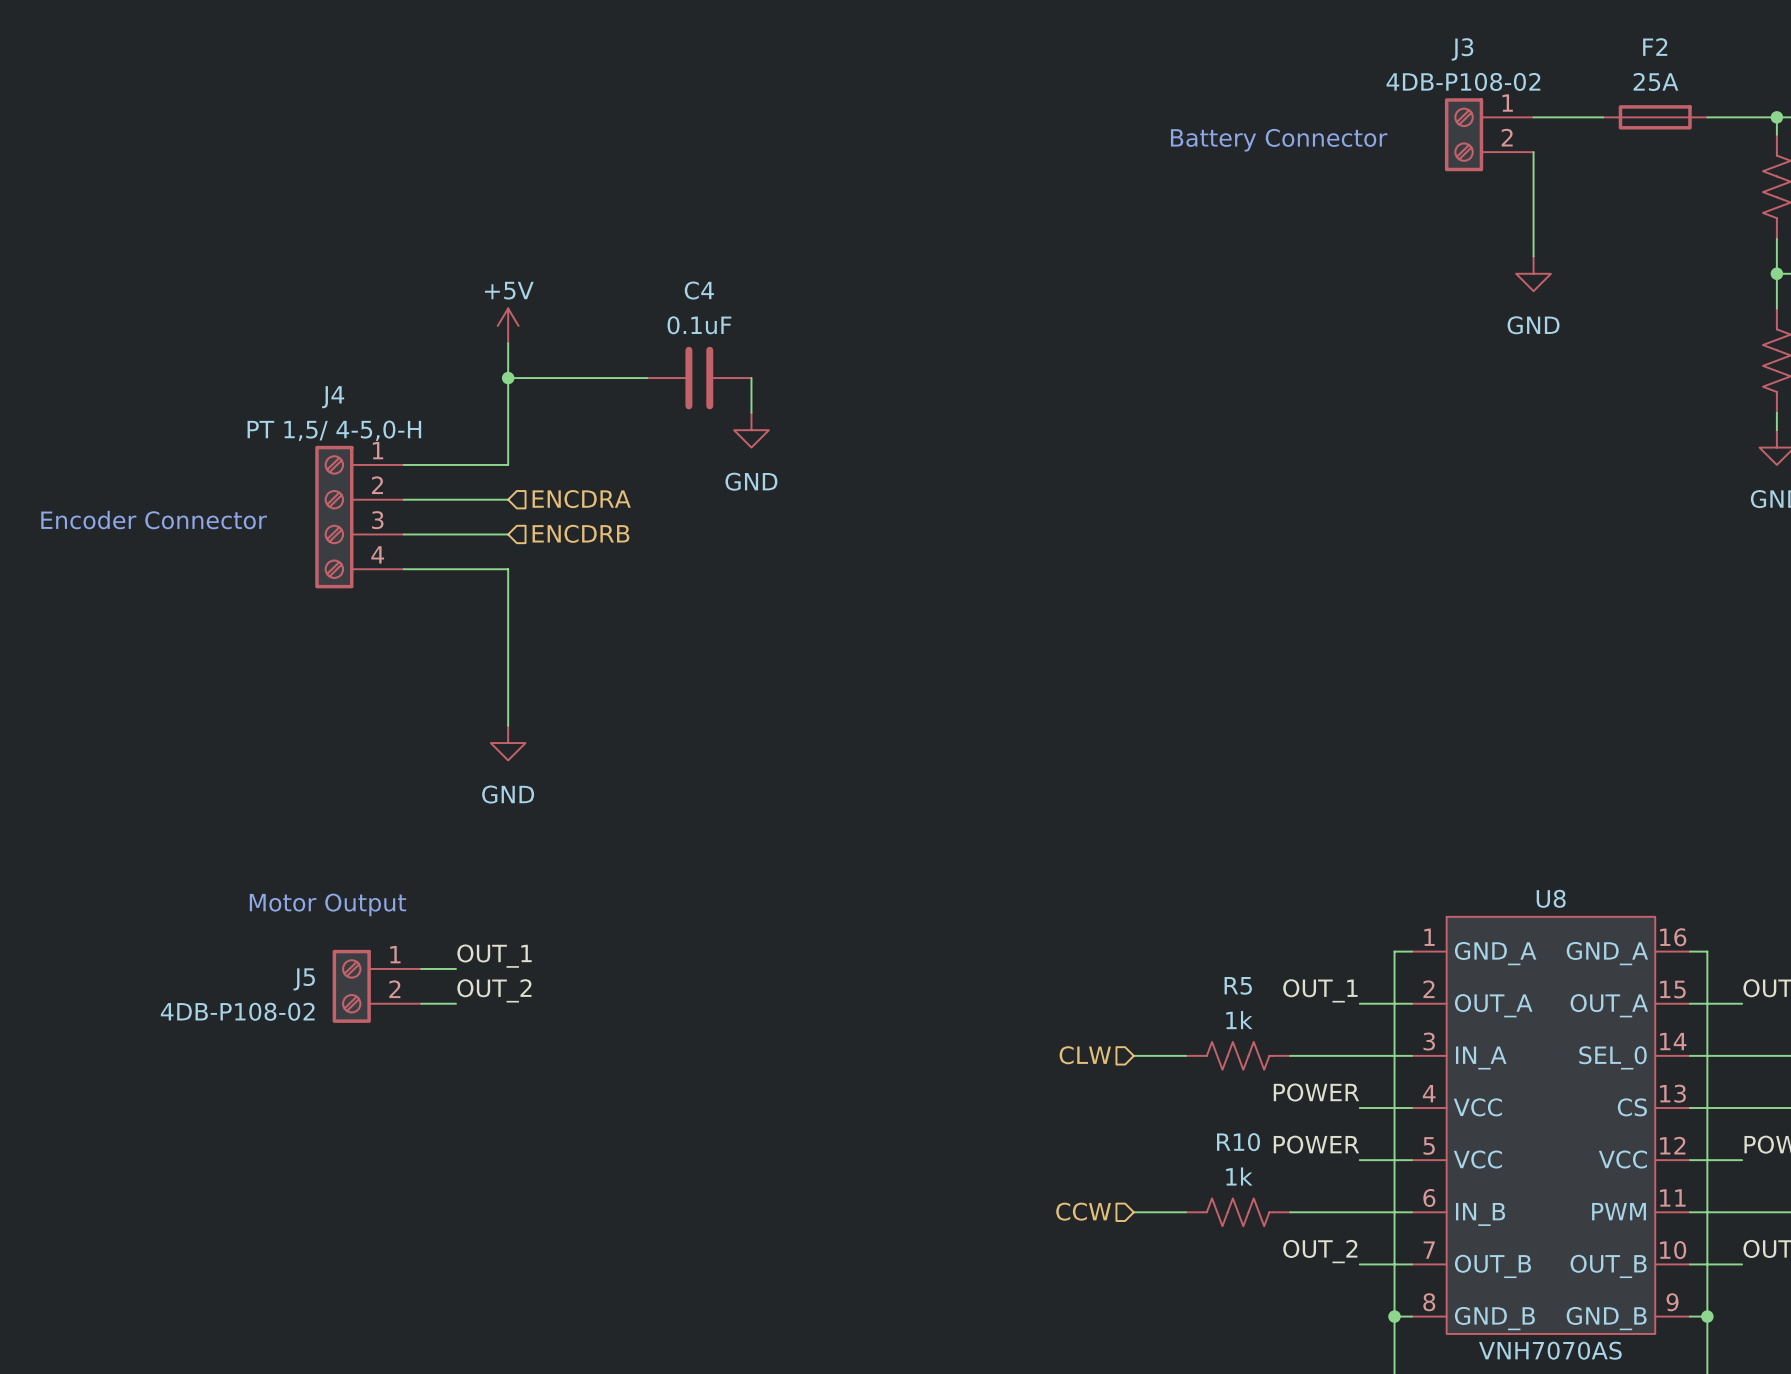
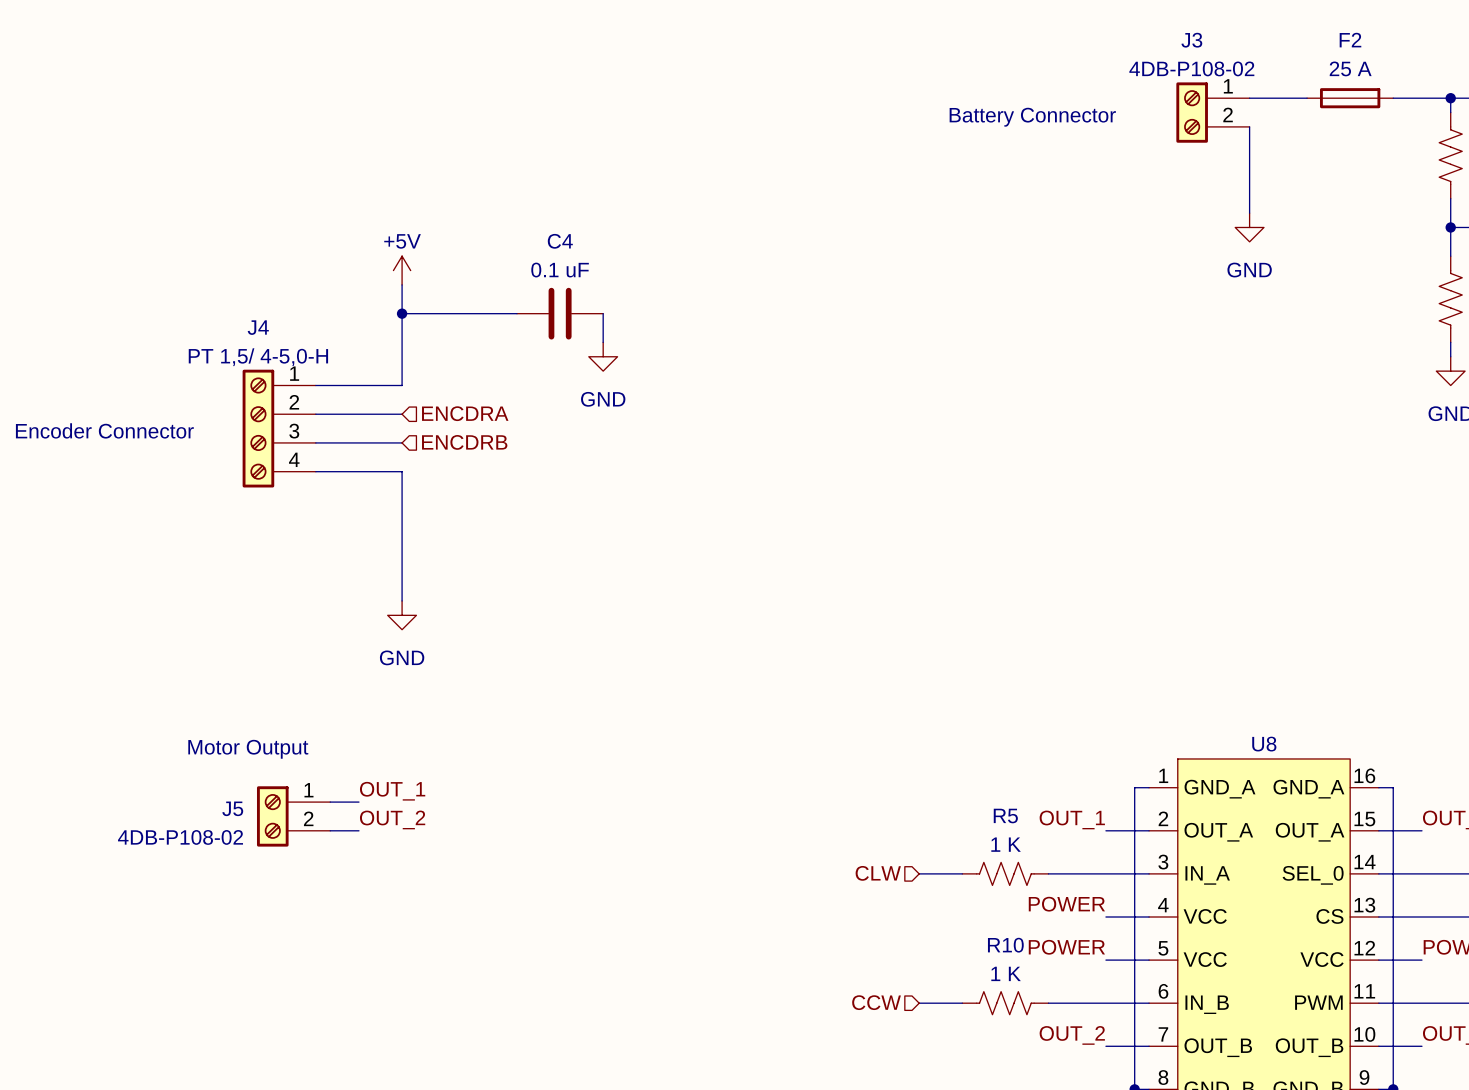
F2 value: 25A (1656, 81) -> 25 A (1350, 68)
C4 value: 0.1uF (699, 325) -> 0.1 uF (560, 270)
R5 value: 1k (1239, 1020) -> 1 K (1006, 844)
R10 value: 1k (1239, 1176) -> 1 K (1006, 973)

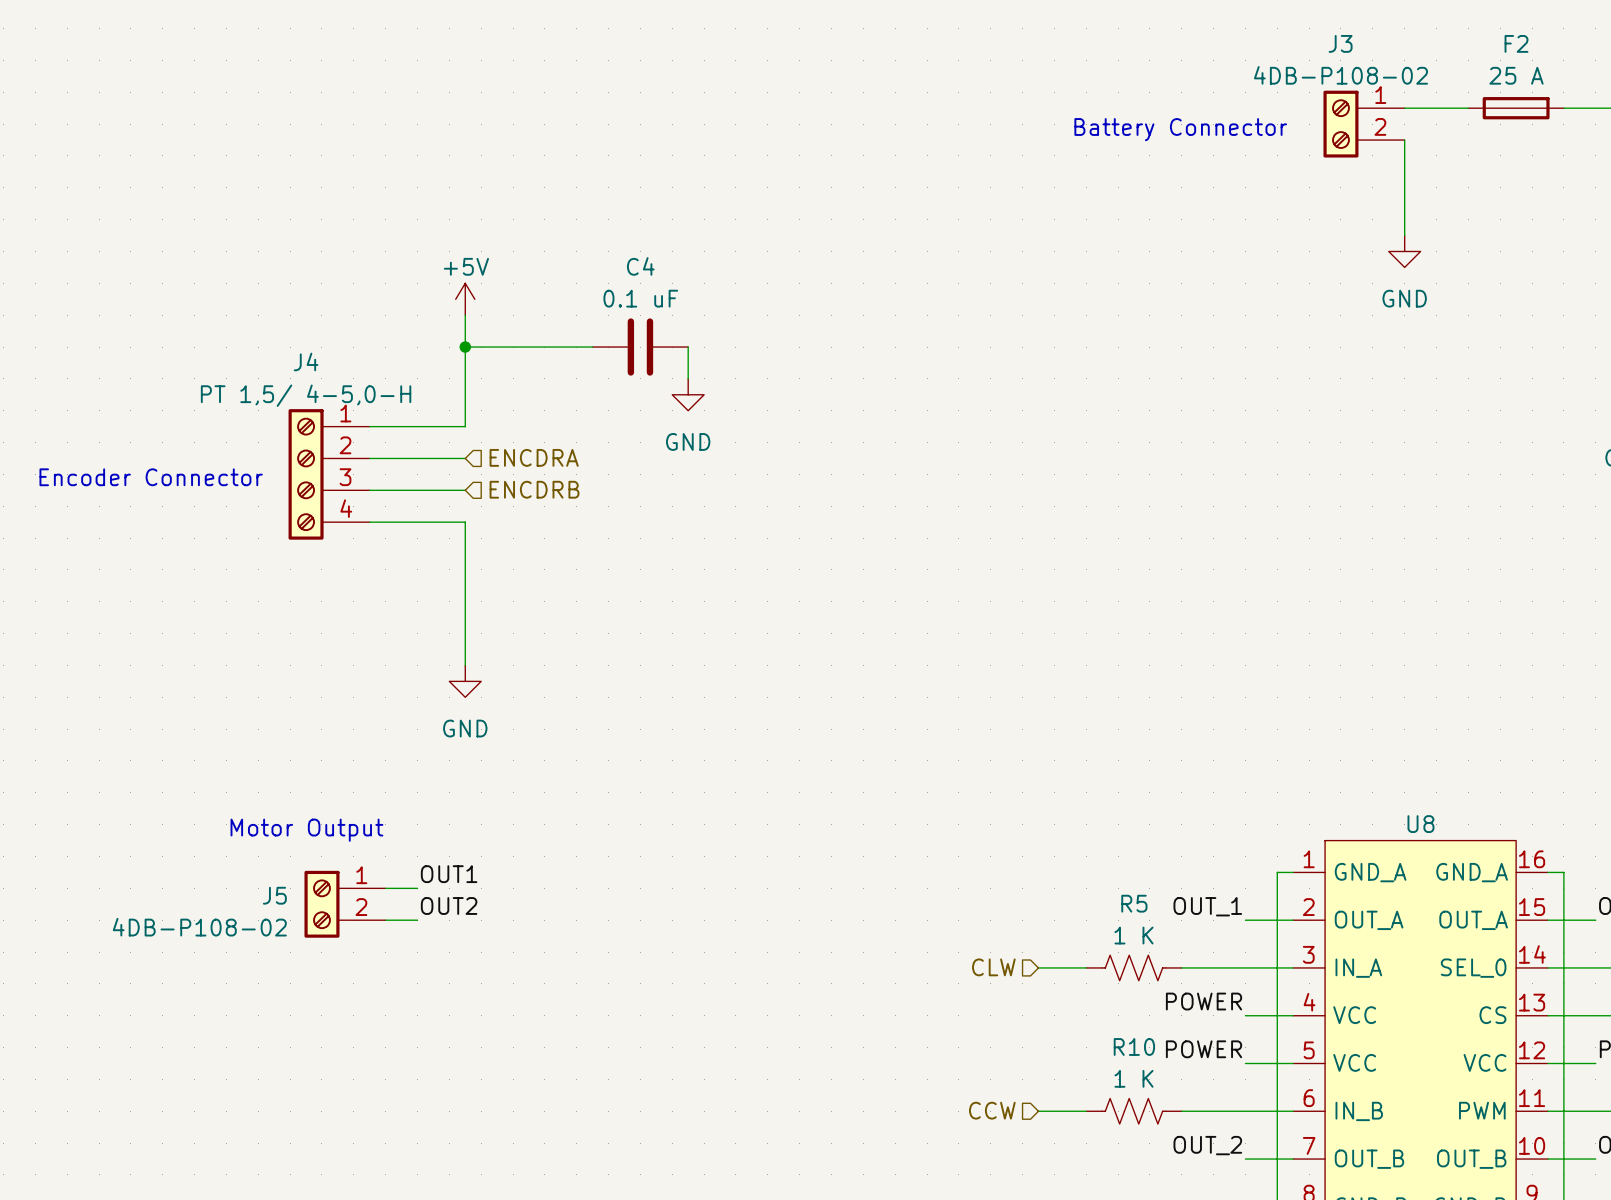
label: OUT_1 (392, 791) -> OUT1 (449, 874)
label: OUT_2 (392, 819) -> OUT2 (449, 905)

